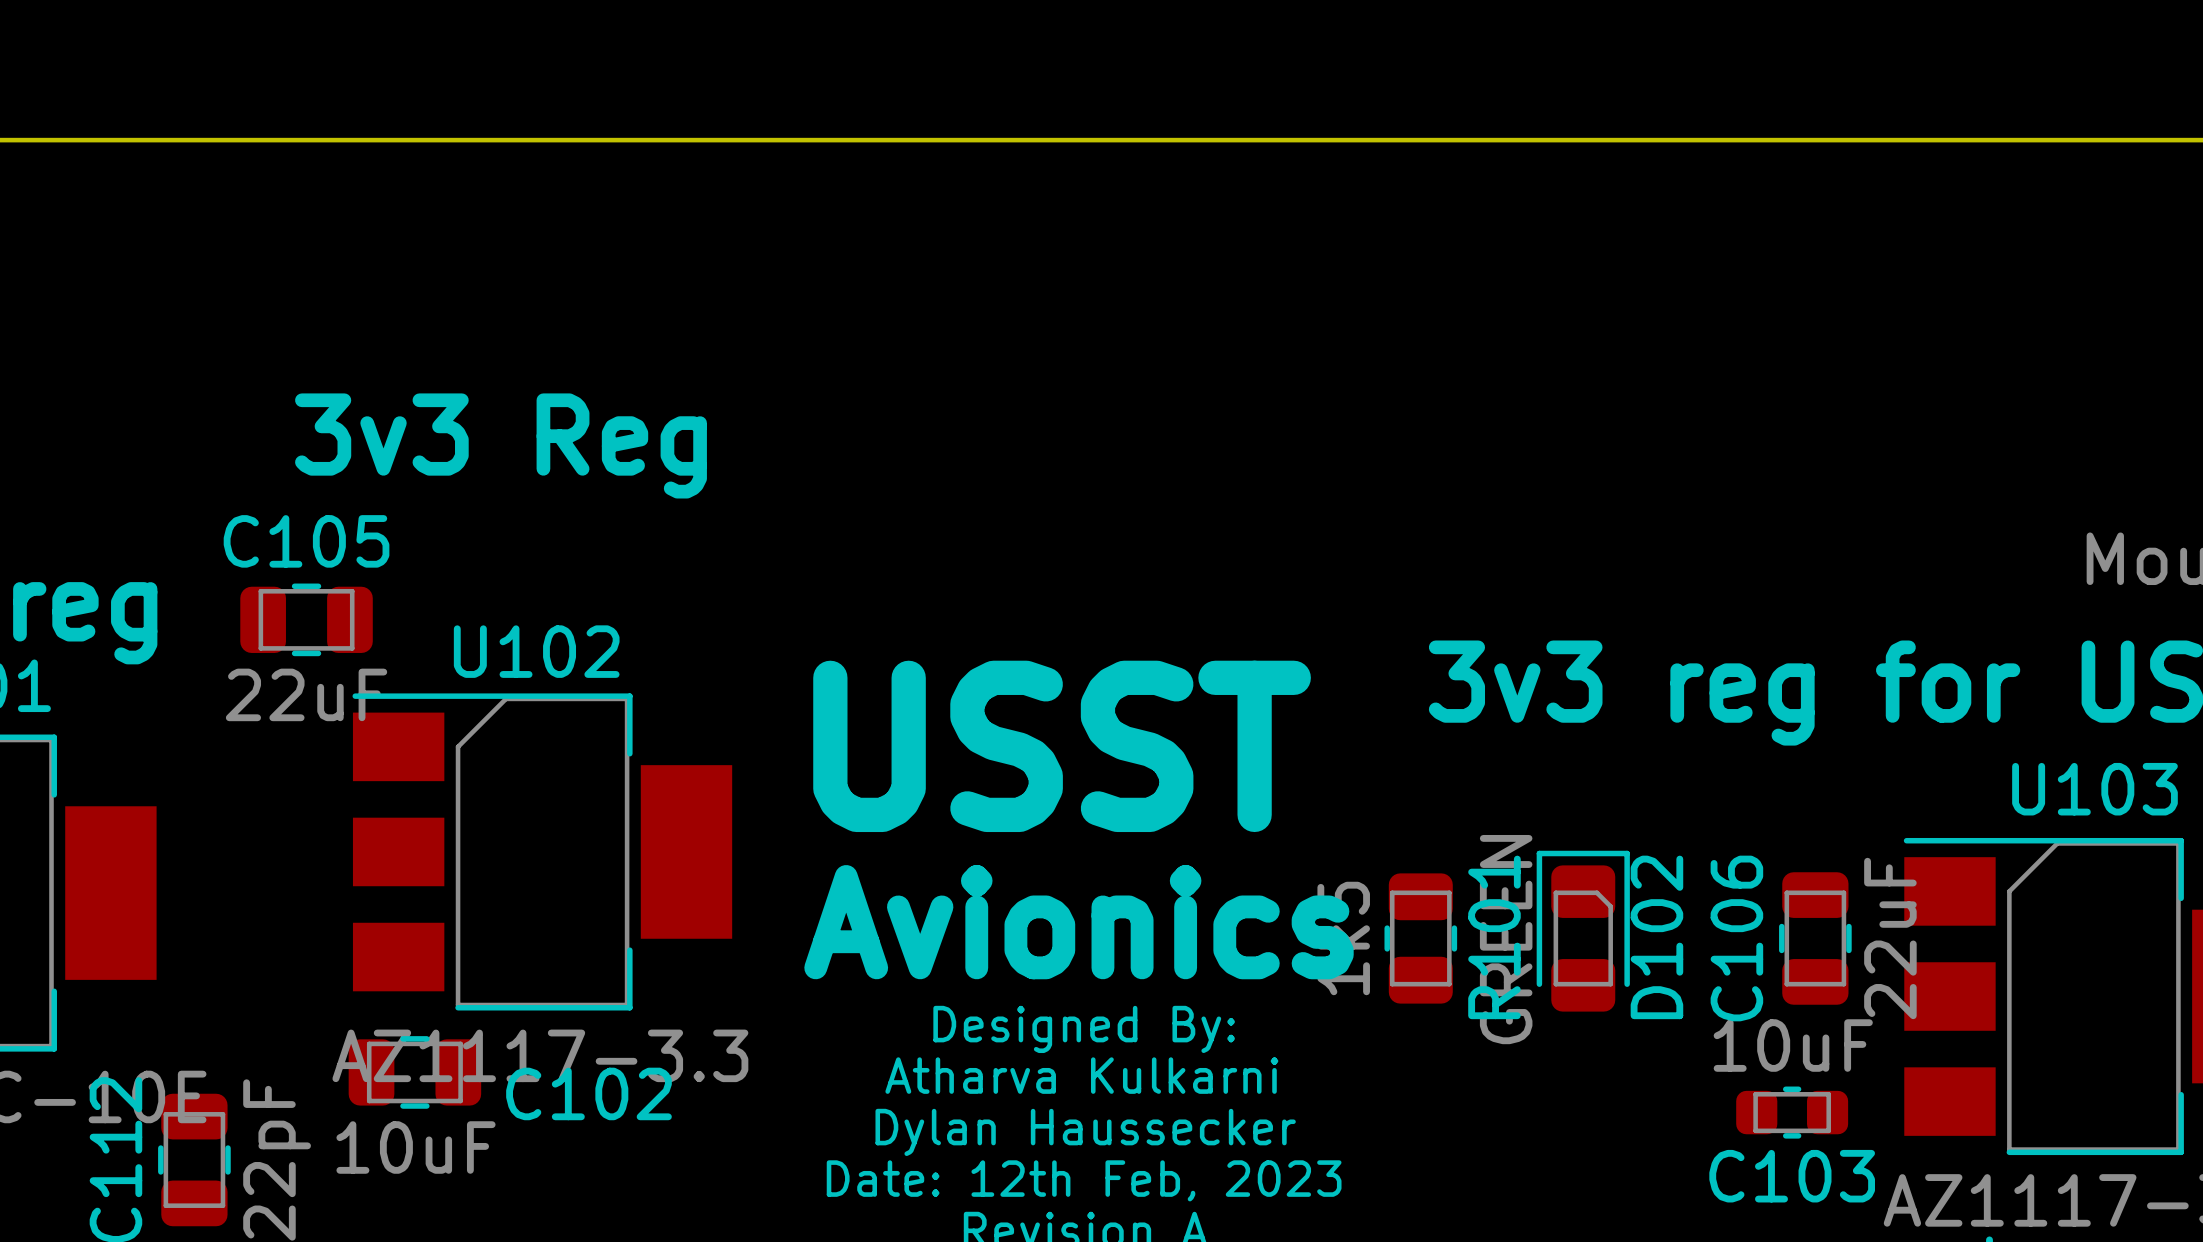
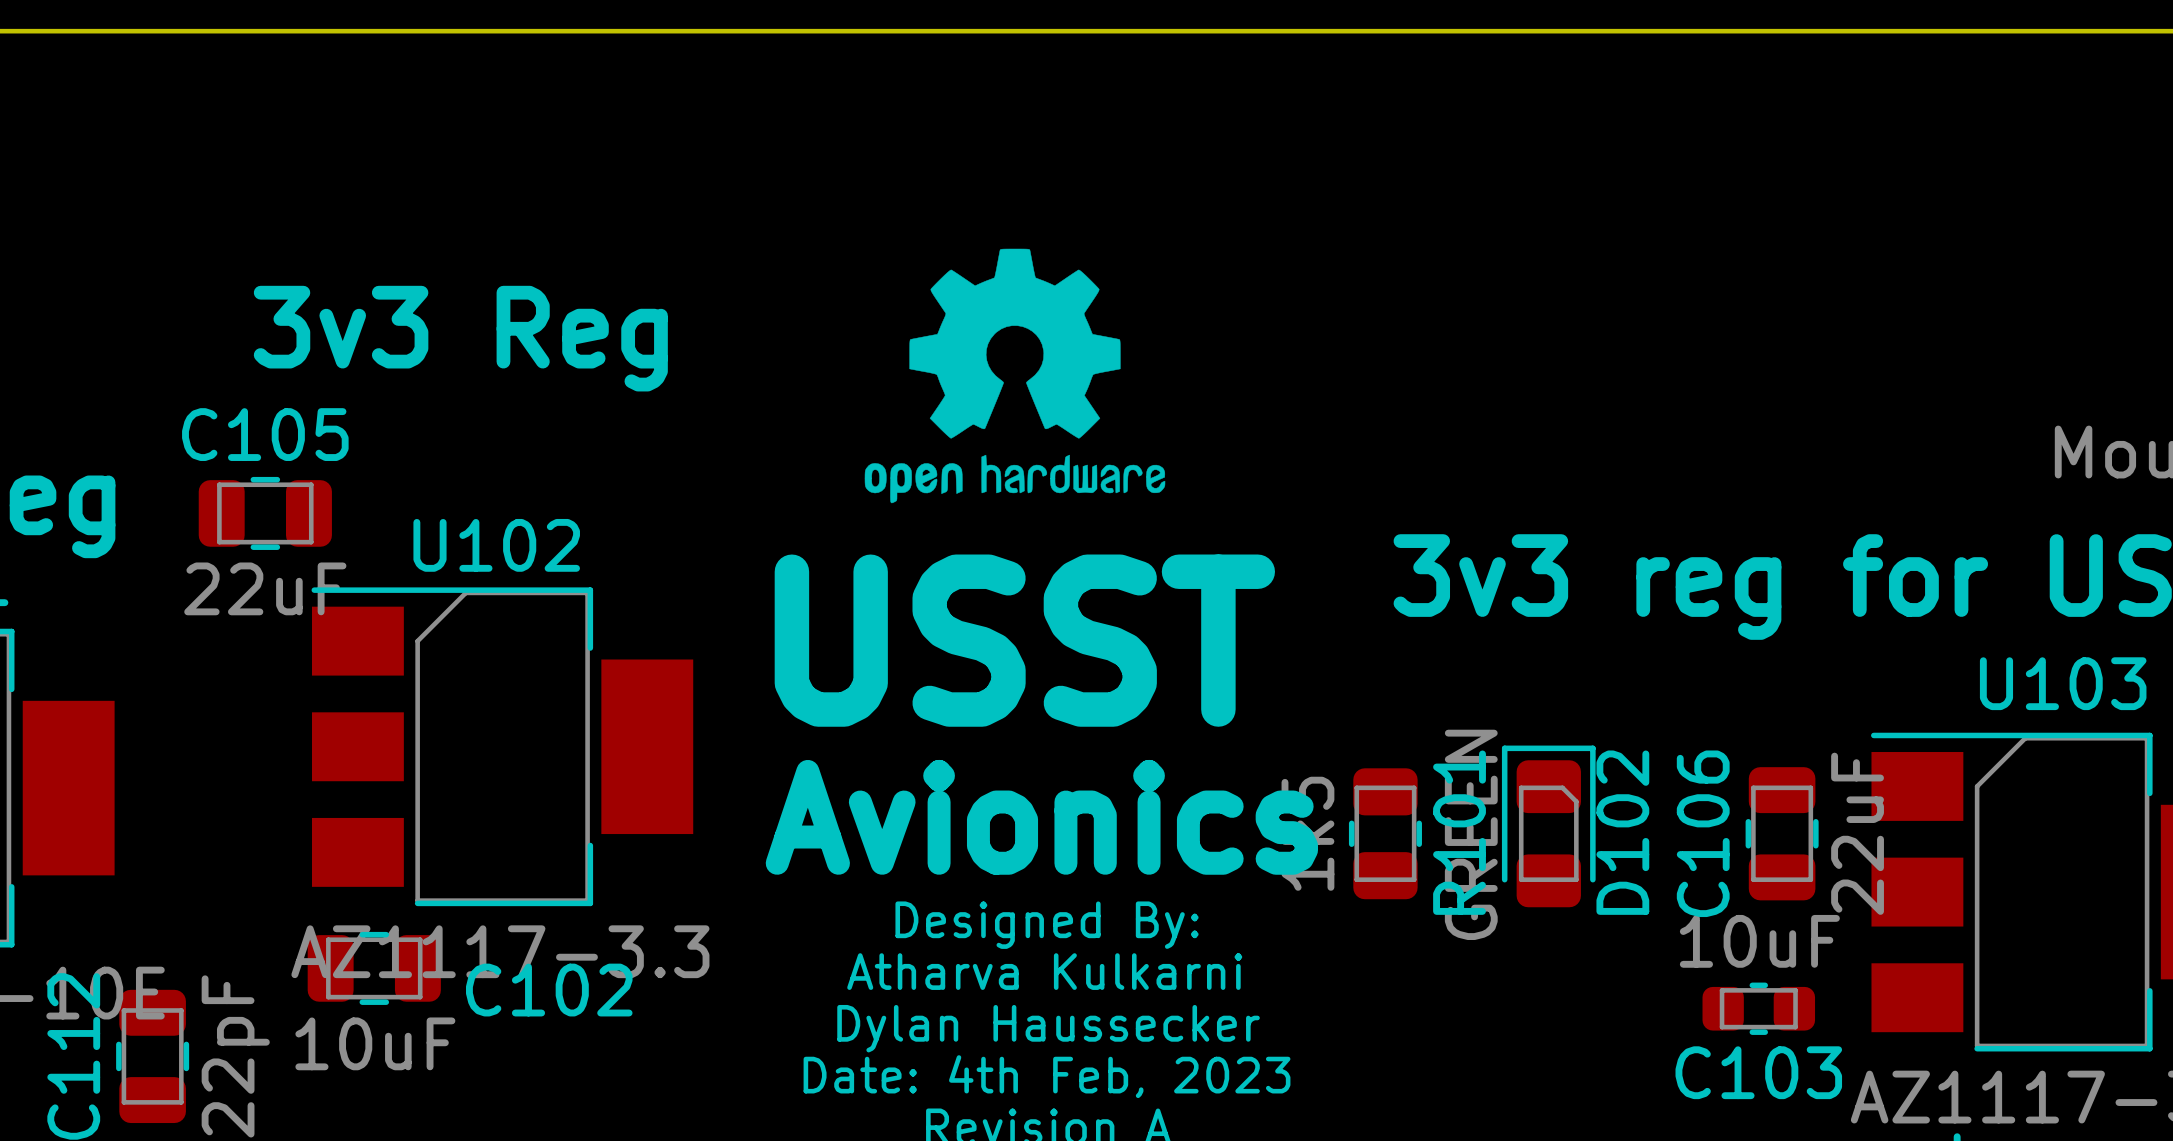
drawing: none -> [864, 248, 1166, 504]
text: Date: 12th Feb, 2023 (1084, 1180) -> Date: 4th Feb, 2023 (1047, 1076)

